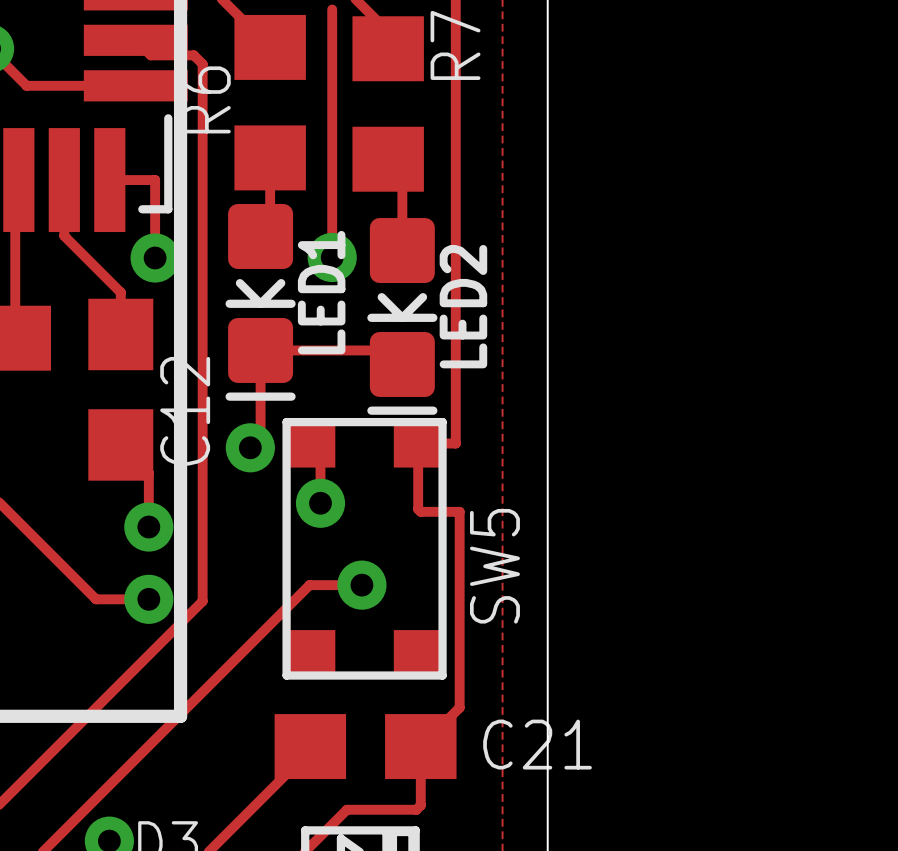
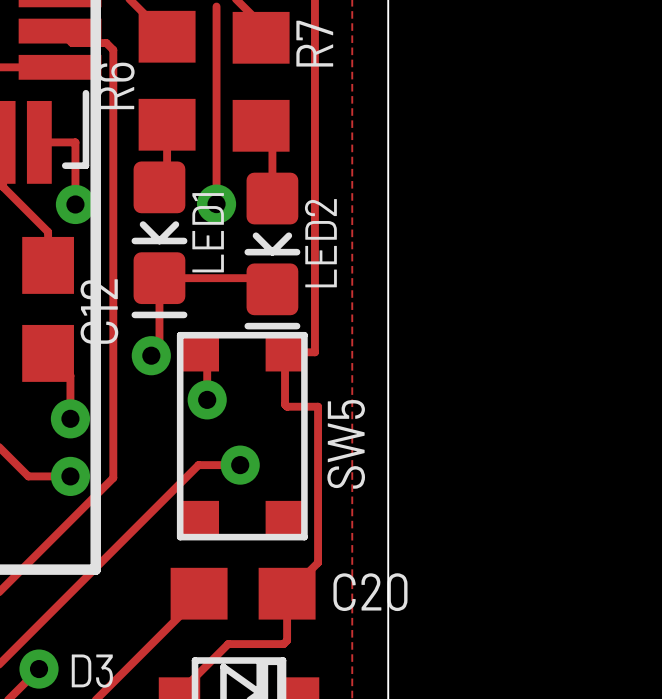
C21 name: C21 (537, 744) -> C20 (370, 592)

